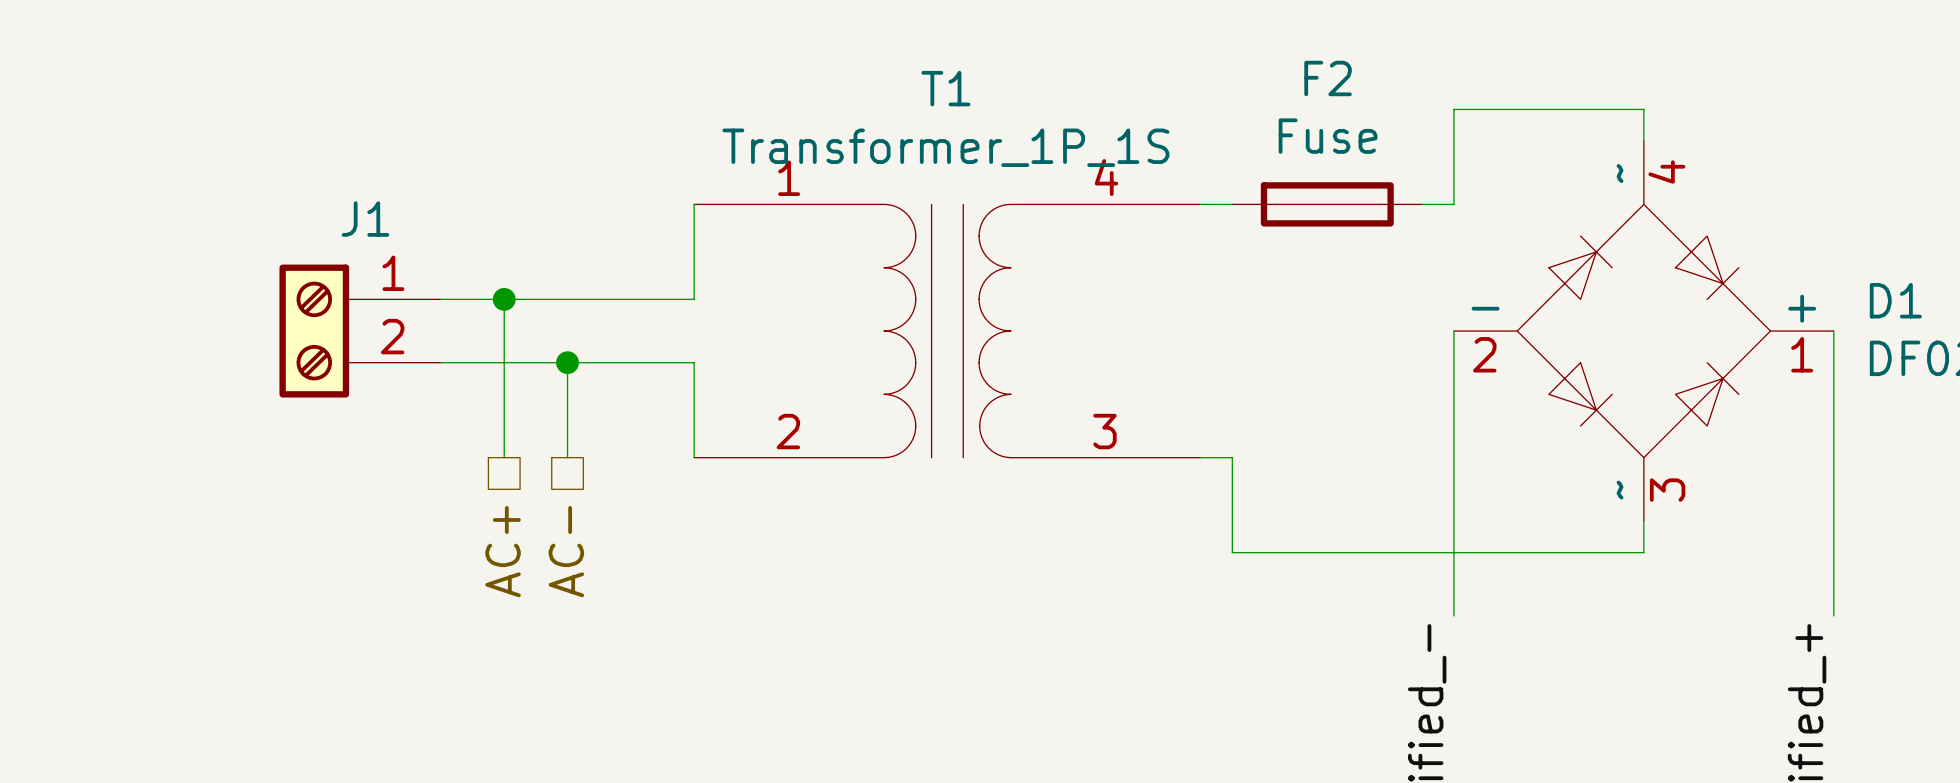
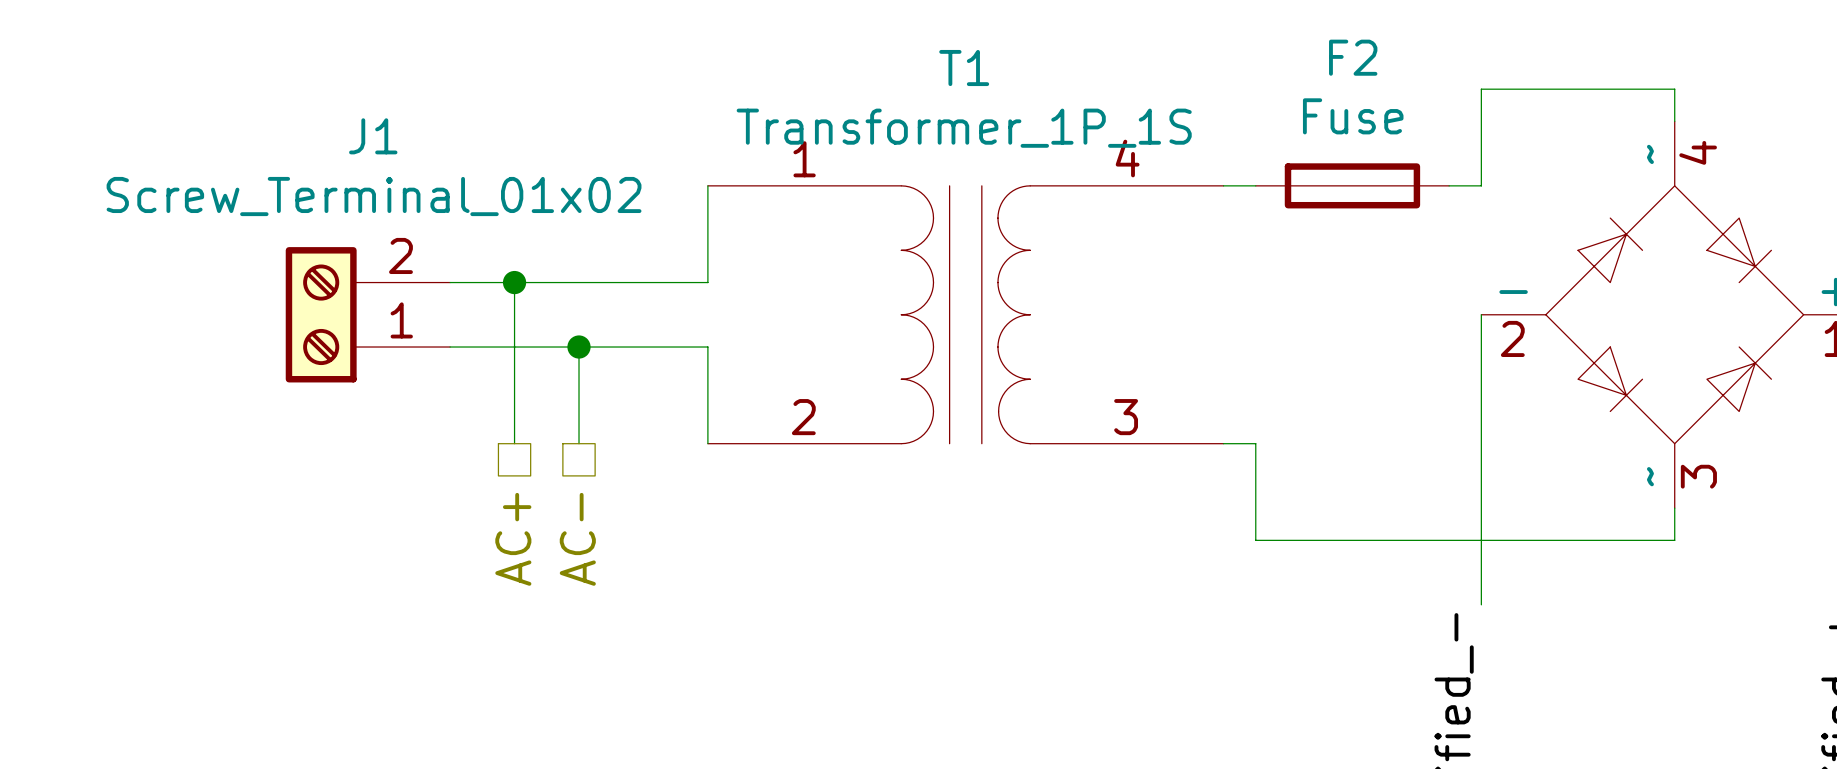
J1 value: none -> Screw_Terminal_01x02 (374, 196)
J1 name position: J1 (365, 219) -> J1 (373, 136)
J1 flip: as is (314, 331) -> up-down (321, 314)

